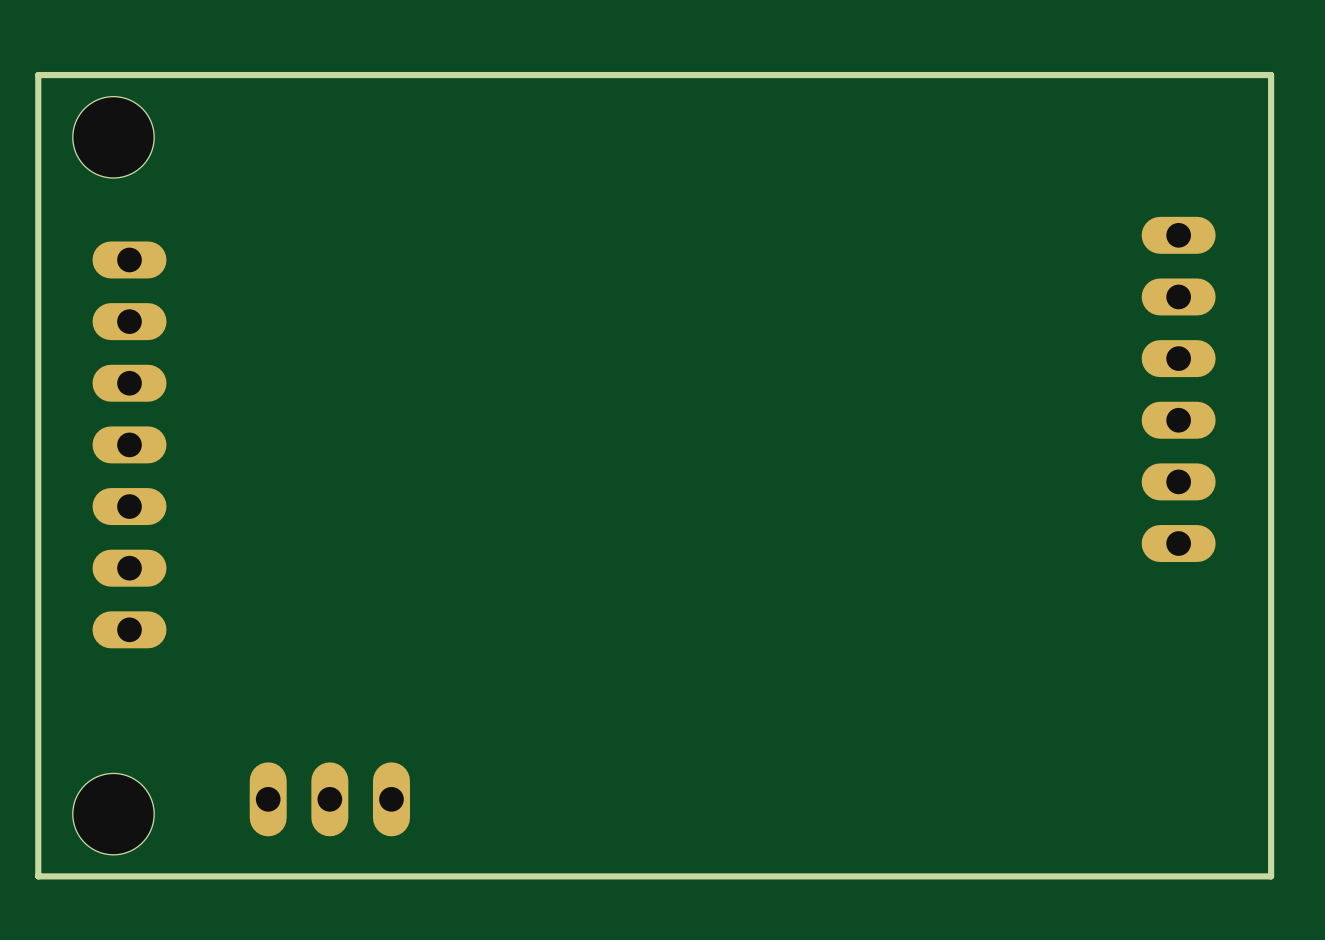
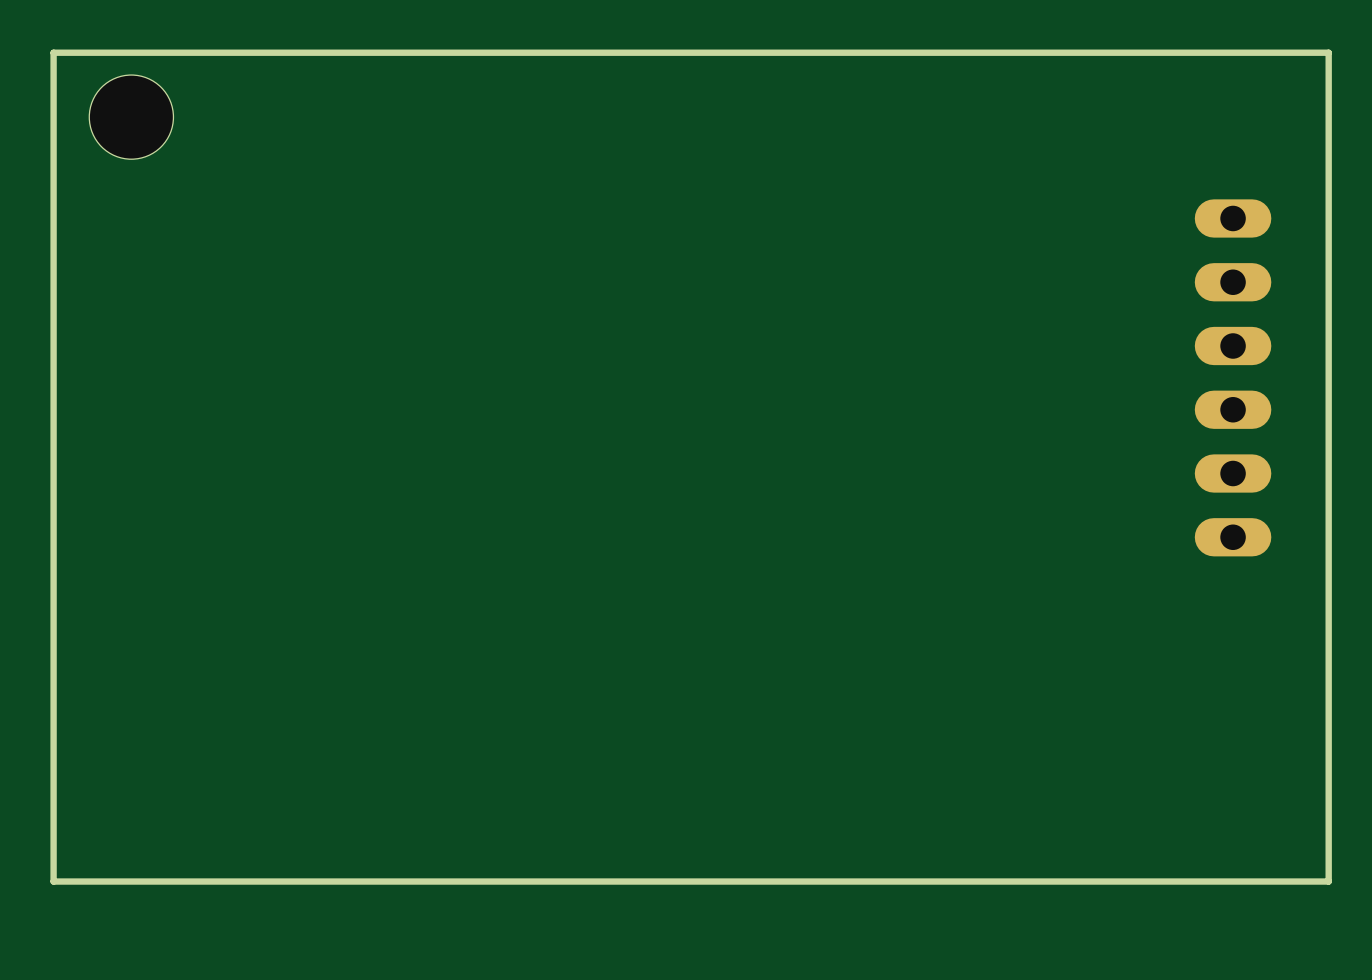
part: (129, 444) -> none
part: (329, 799) -> none
hole: (113, 814) -> none

